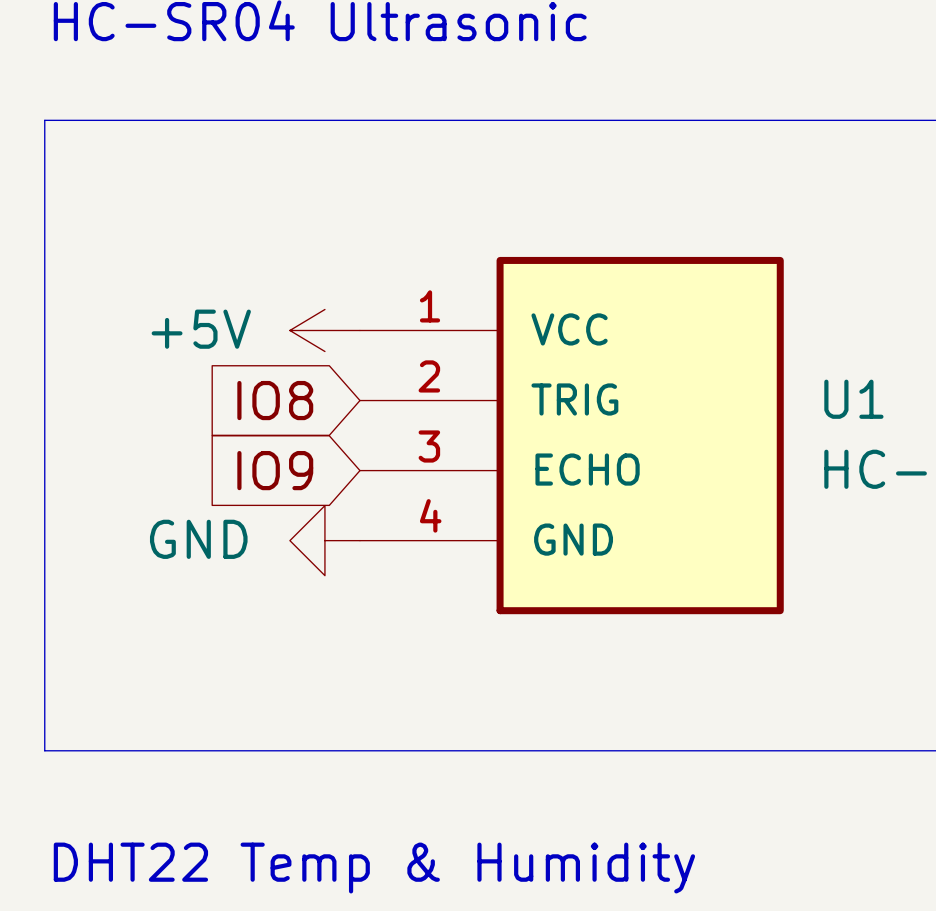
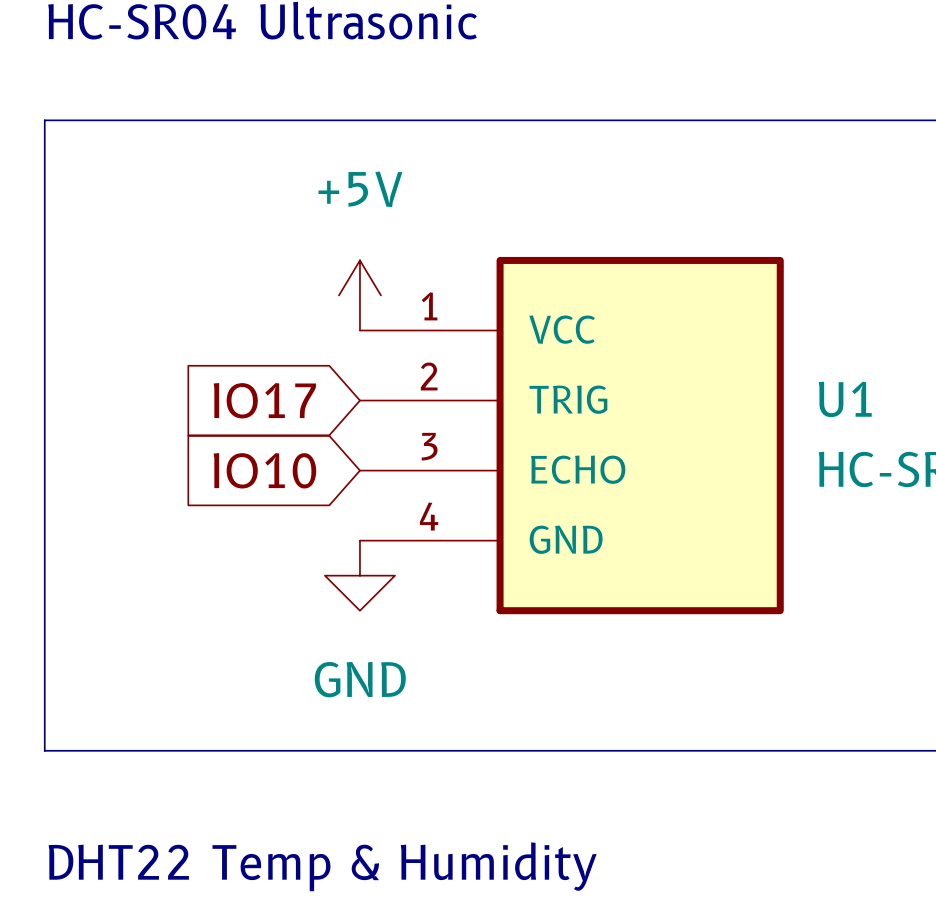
power symbol rotation: 0° (324, 330) -> 90° clockwise (359, 295)
power symbol position: +5V (324, 330) -> +5V (359, 295)
global label: IO8 (275, 400) -> IO17 (264, 400)
global label: IO9 (275, 470) -> IO10 (264, 470)
power symbol rotation: 0° (324, 540) -> 90° counterclockwise (359, 575)
power symbol position: GND (324, 540) -> GND (359, 575)

